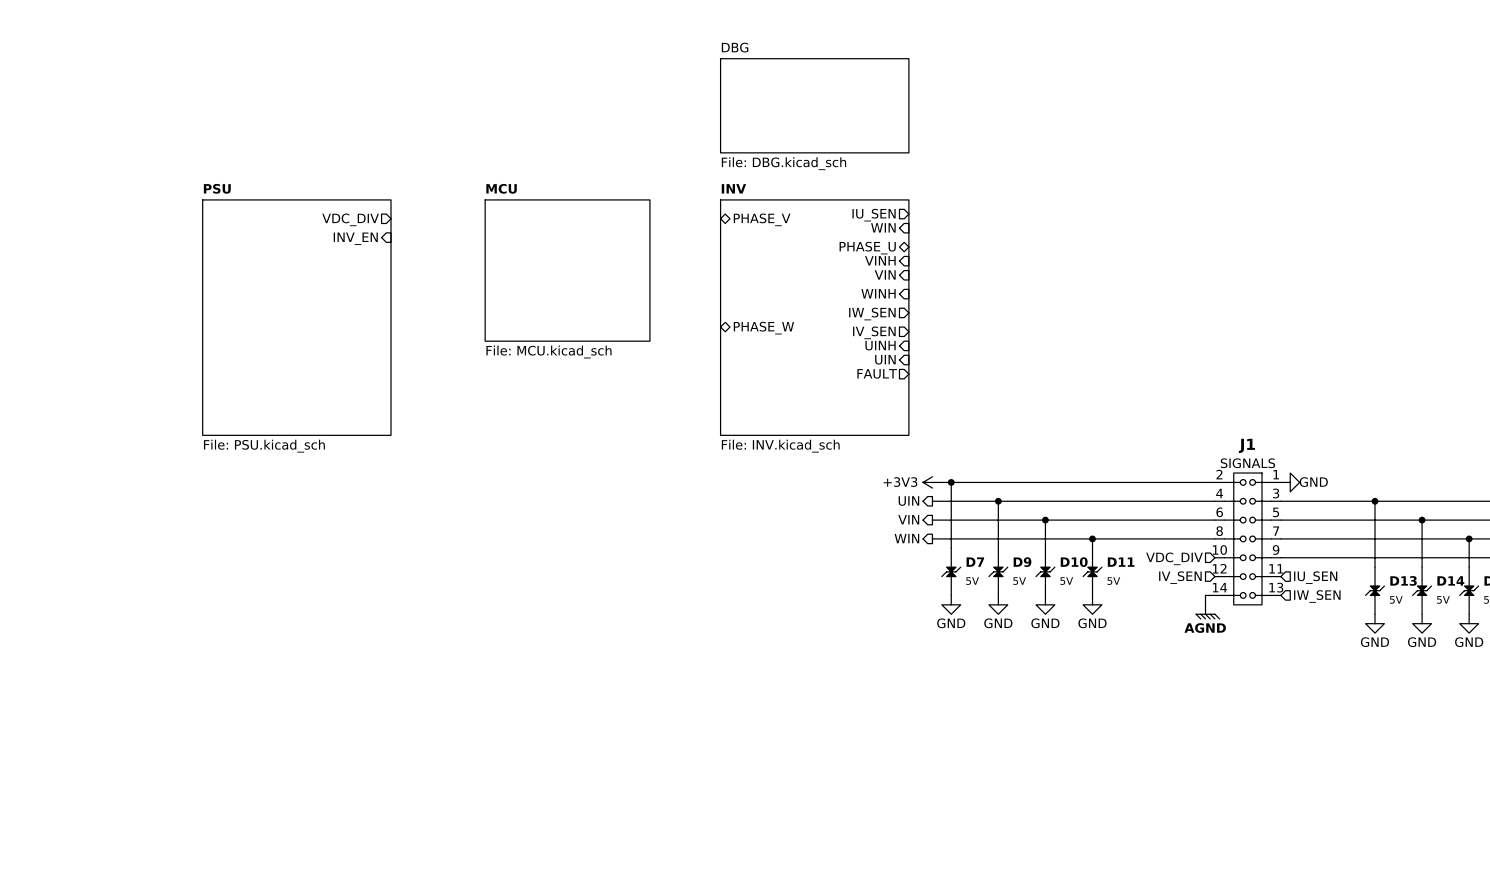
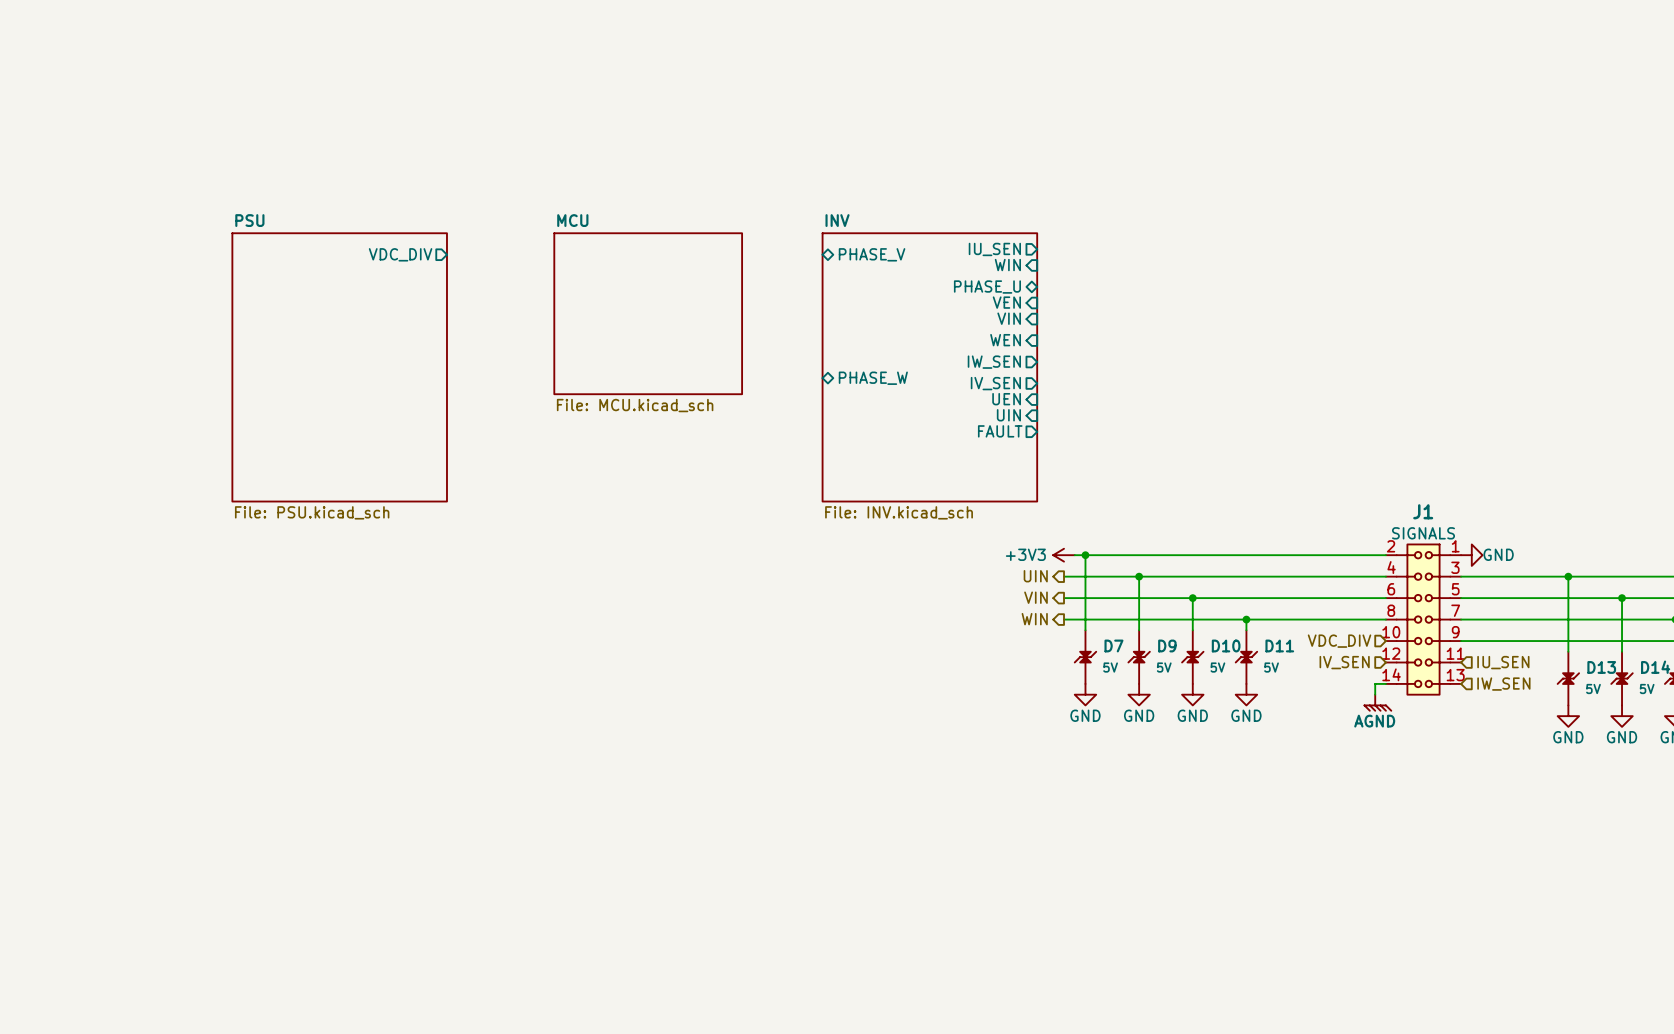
sheet DBG: File: DBG.kicad_sch (814, 105) -> none
sheet pin: INV_EN (355, 238) -> none
sheet pin: VINH (880, 260) -> VEN (1006, 302)
sheet pin: WINH (878, 293) -> WEN (1005, 340)
sheet pin: UINH (880, 345) -> UEN (1006, 399)

